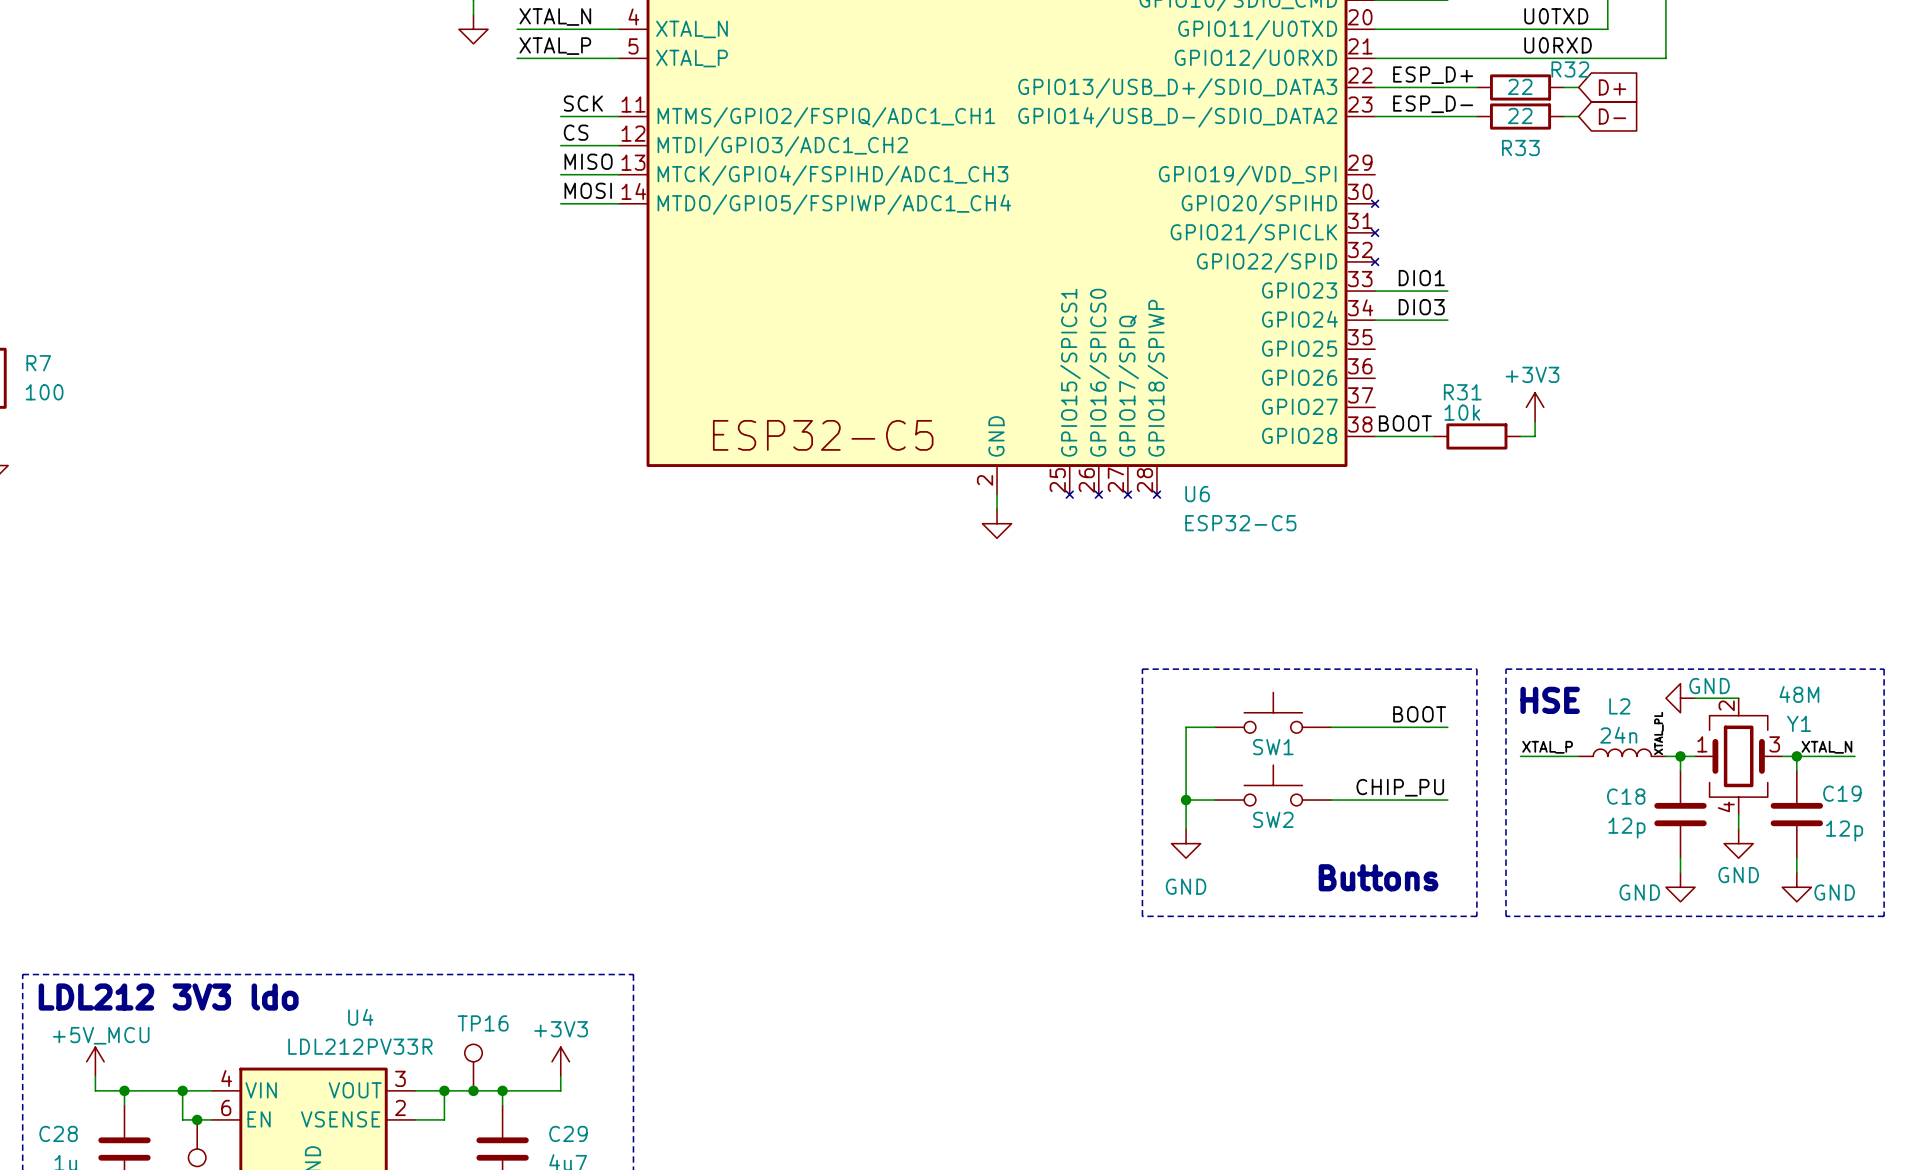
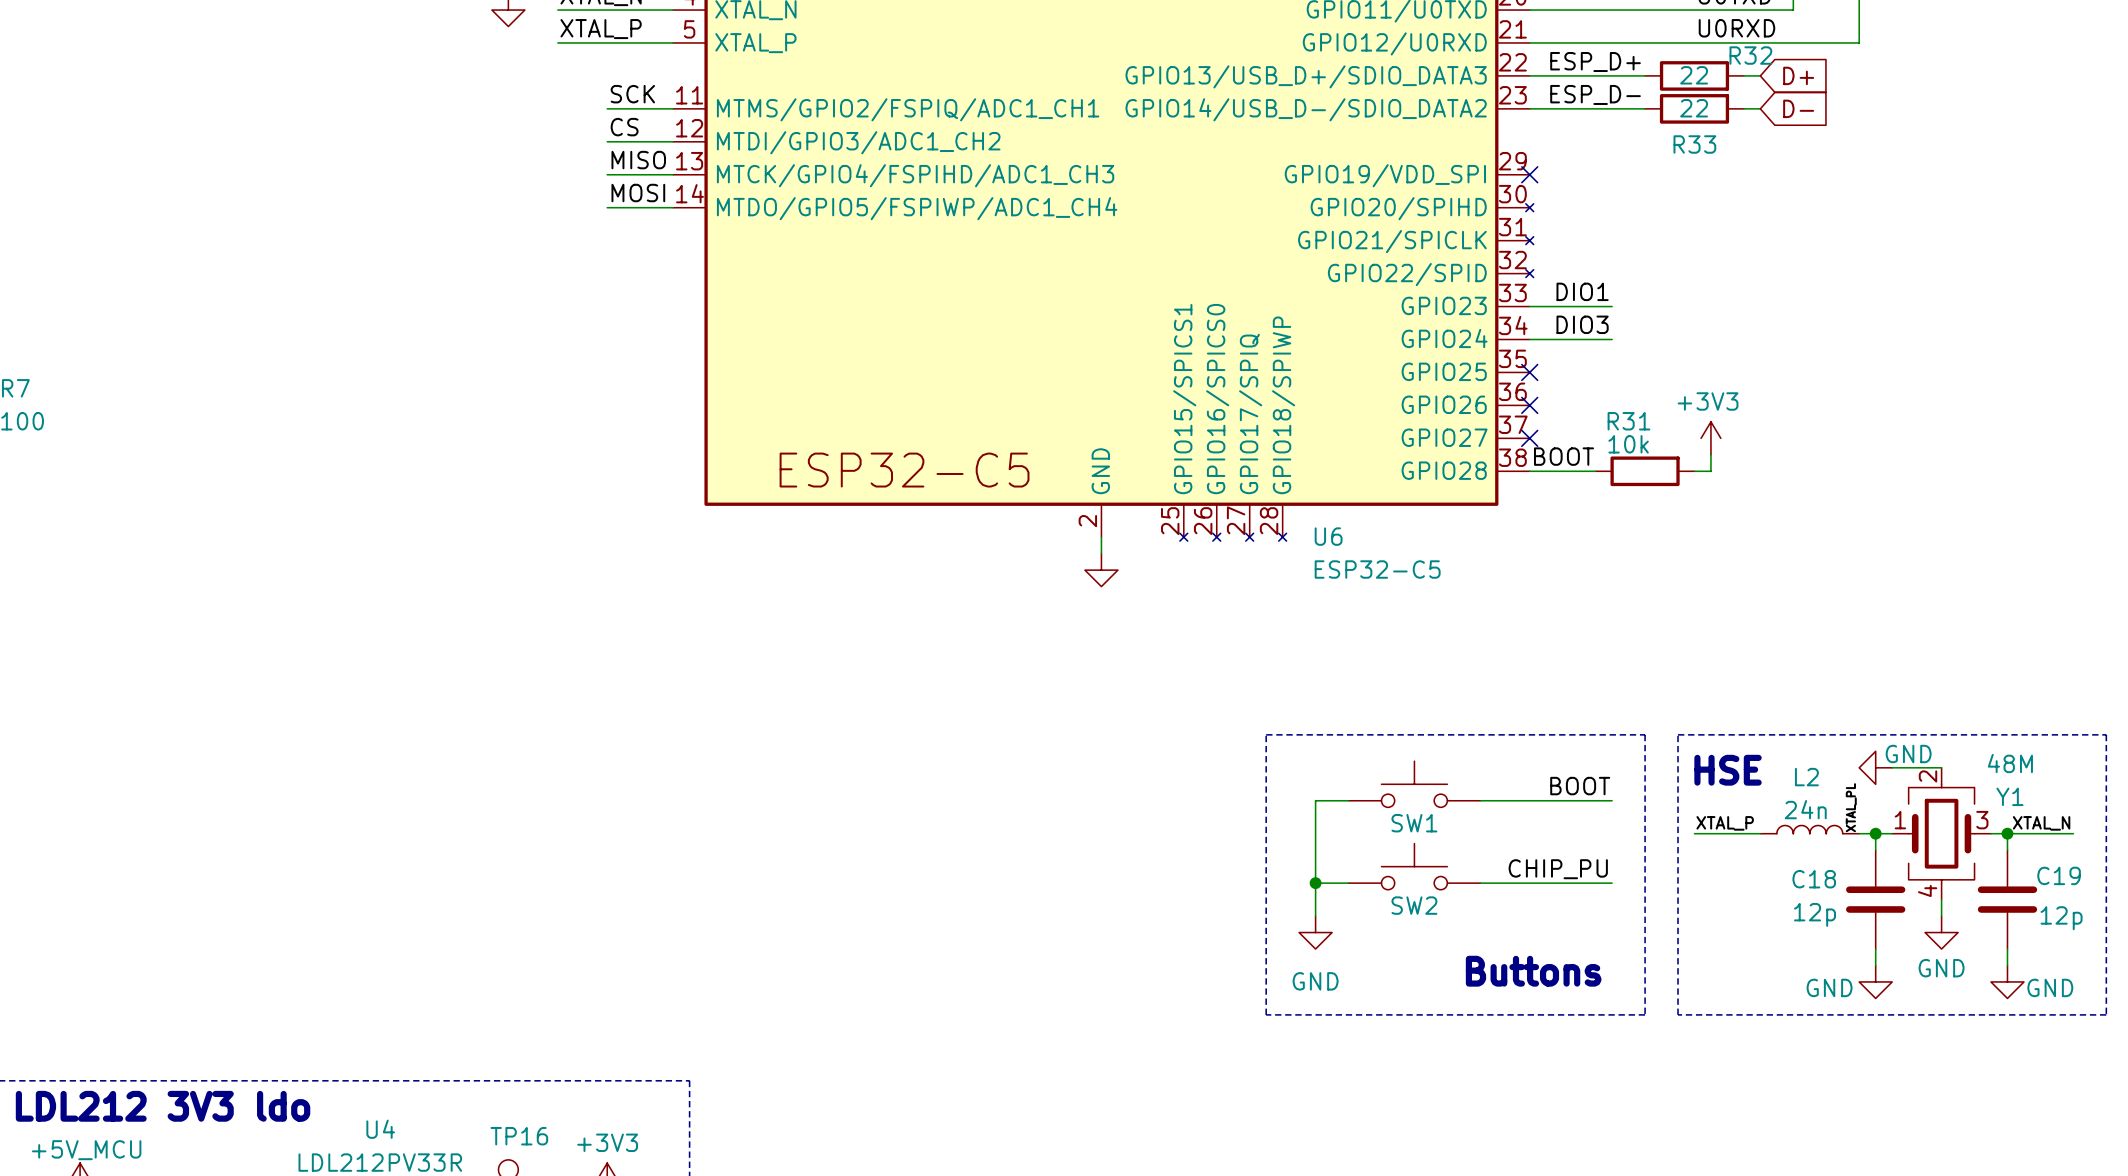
no-connect mark: none -> (1529, 174)
no-connect mark: none -> (1529, 372)
no-connect mark: none -> (1529, 405)
no-connect mark: none -> (1529, 438)

